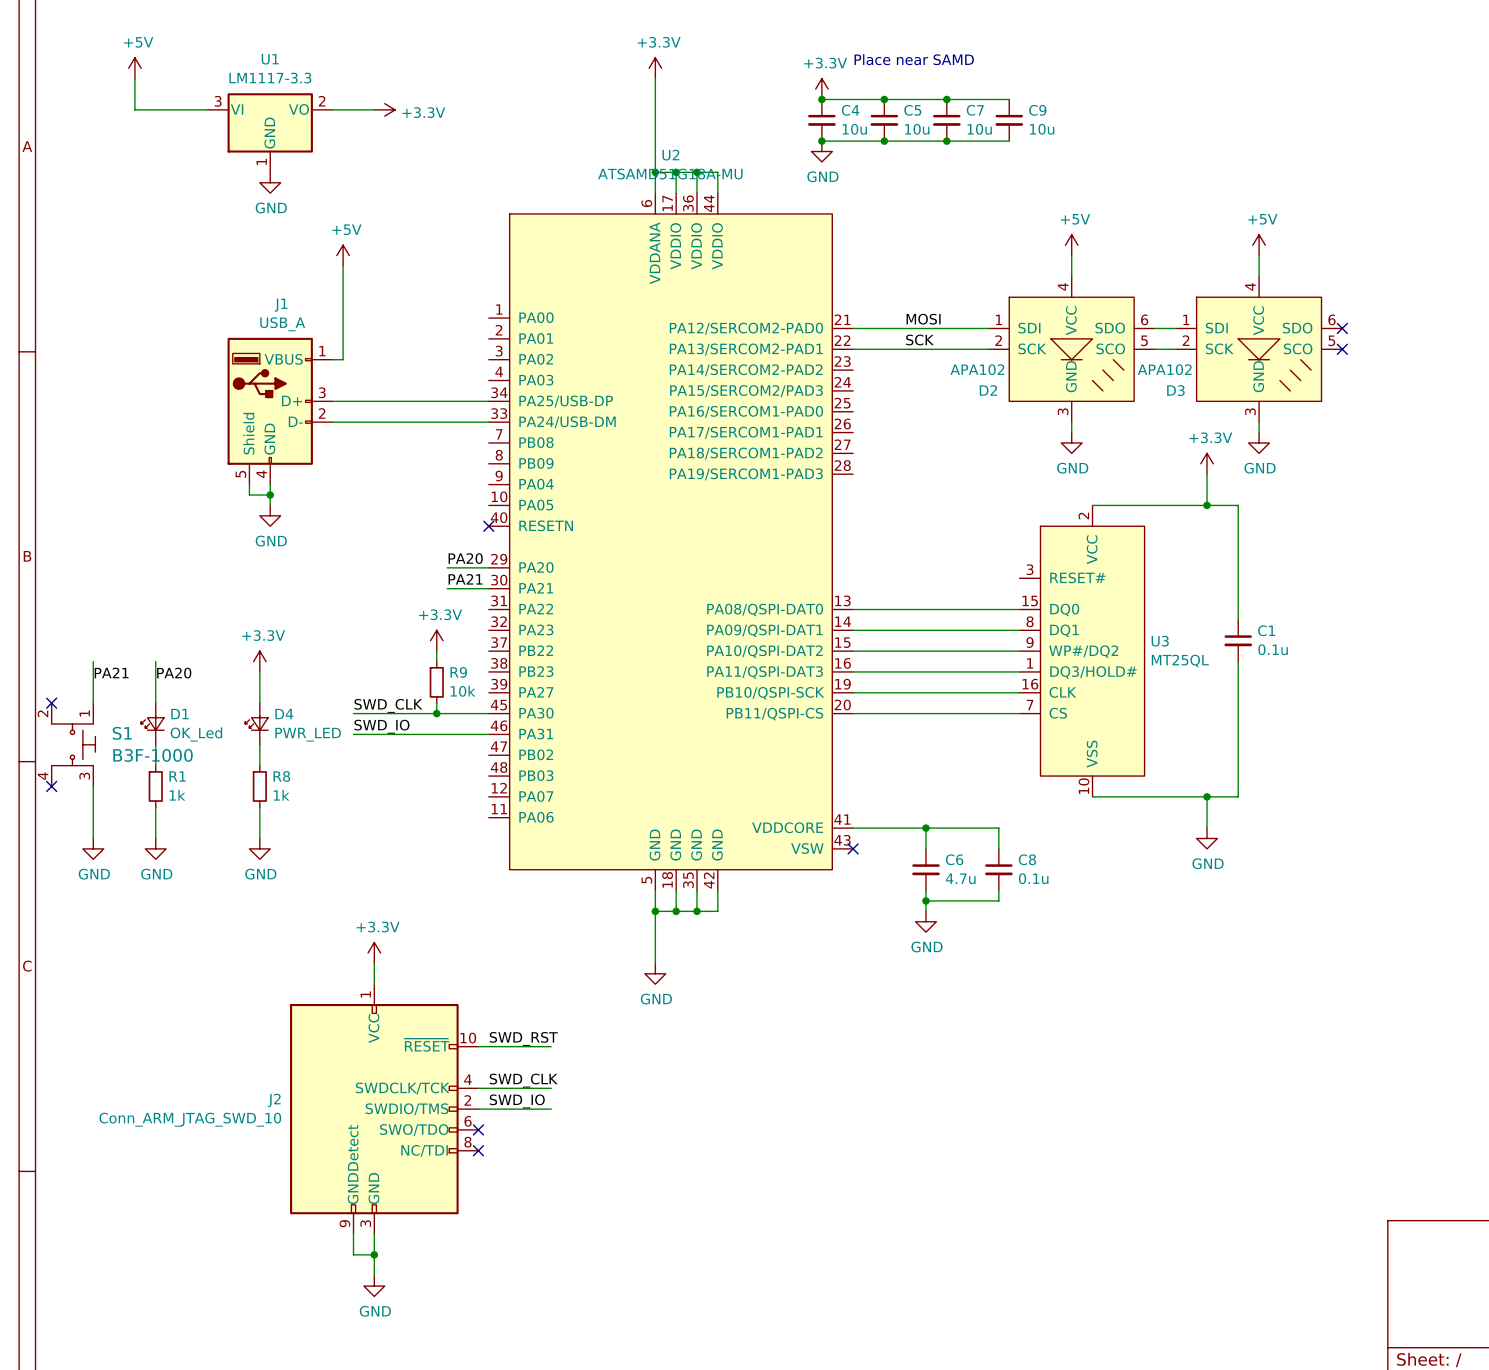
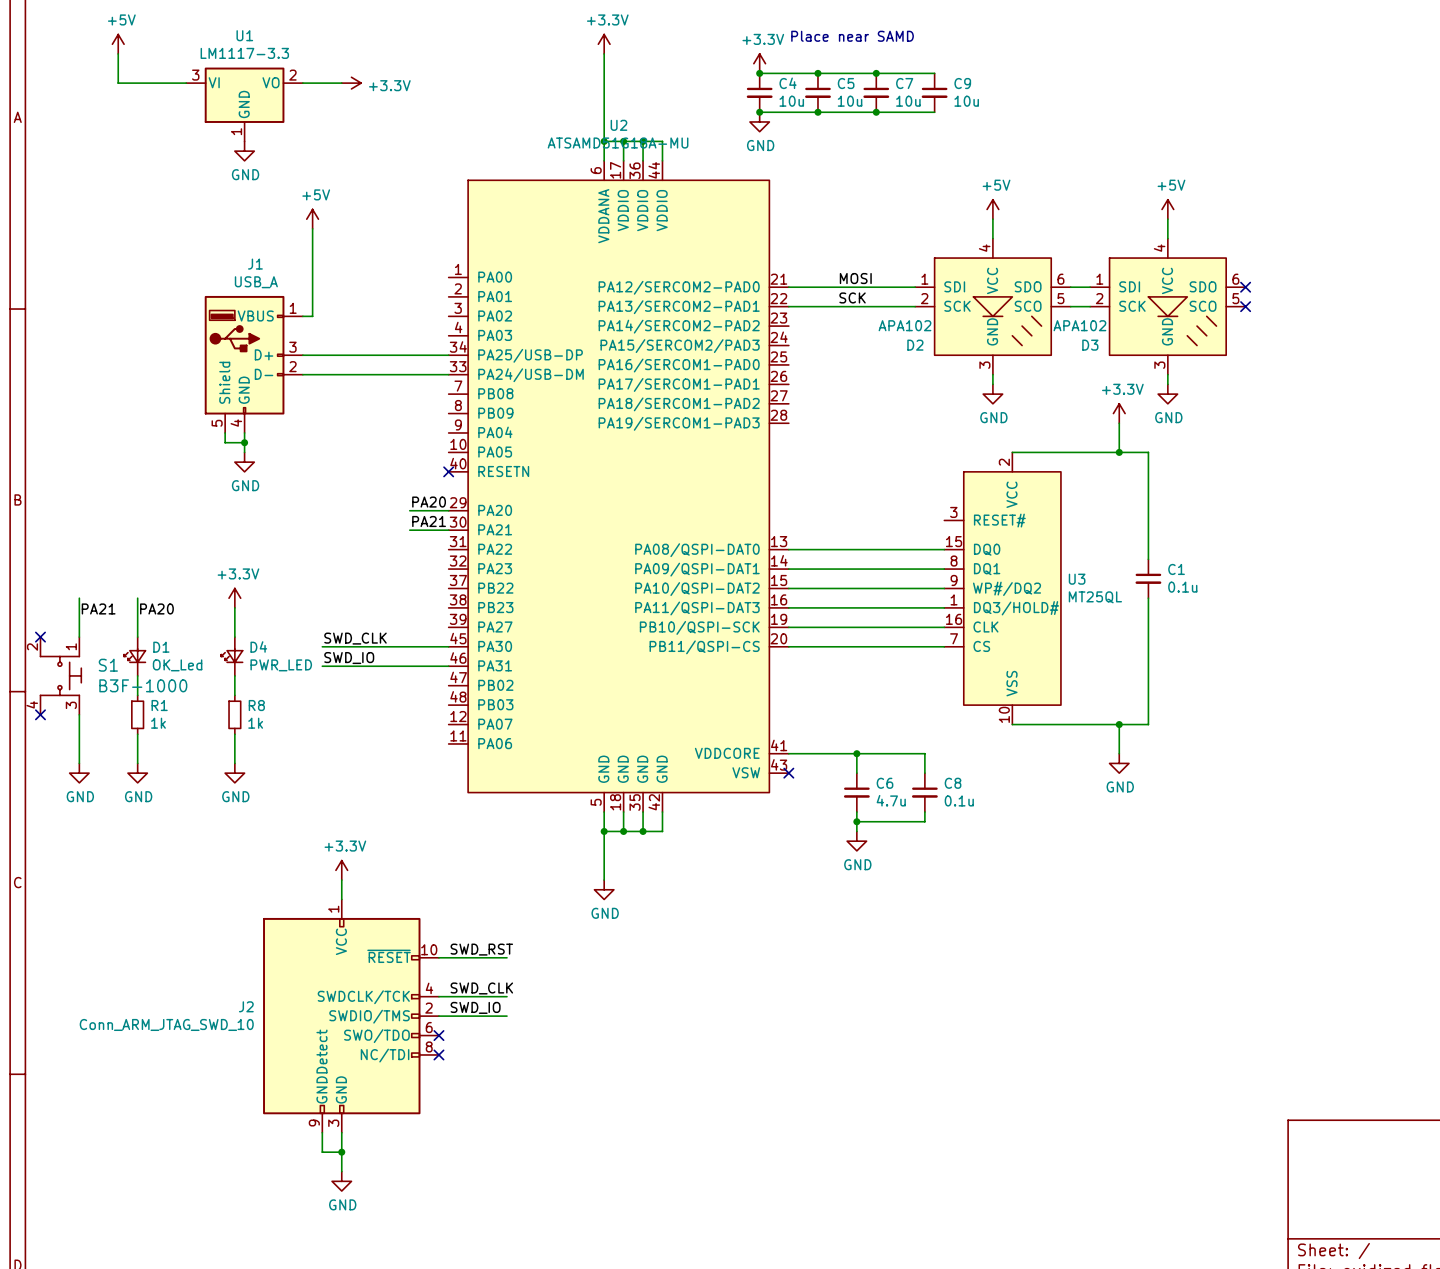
power symbol: +3.3V (436, 640) -> none
wire: (436, 651) (436, 661) -> none
R9: 10k (436, 682) -> none
wire: (436, 703) (436, 713) -> none
junction: (436, 713) -> none

